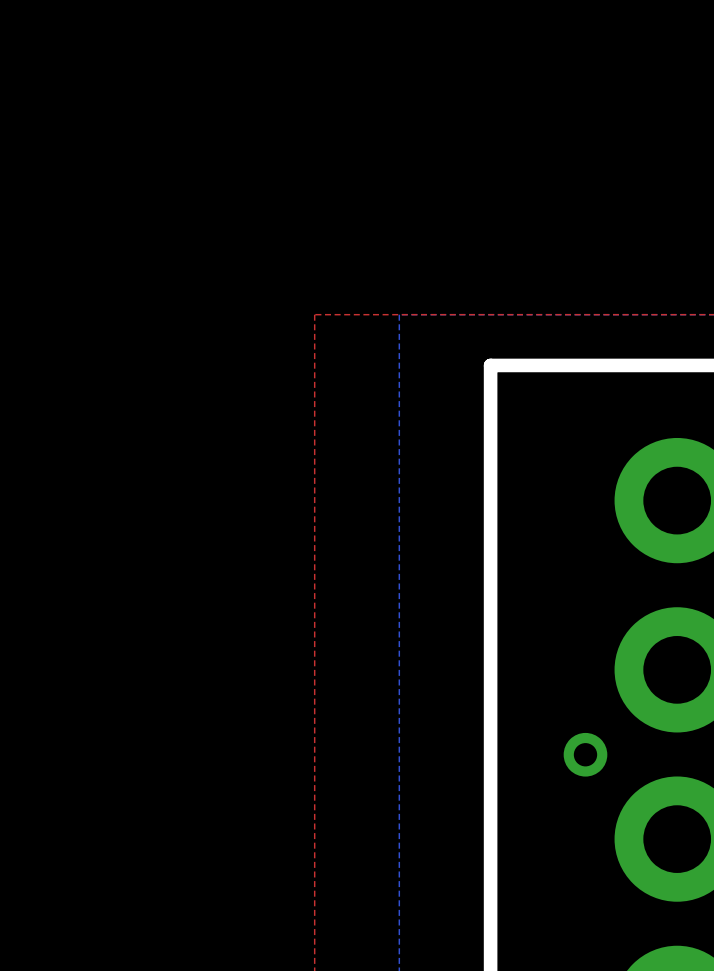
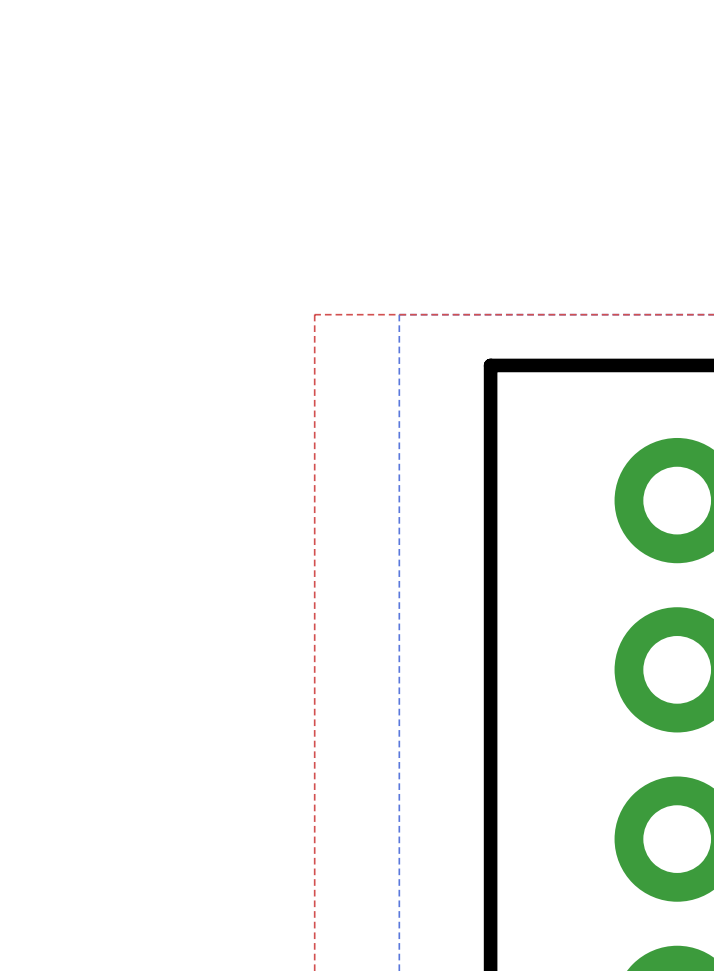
via: (585, 754) -> none

